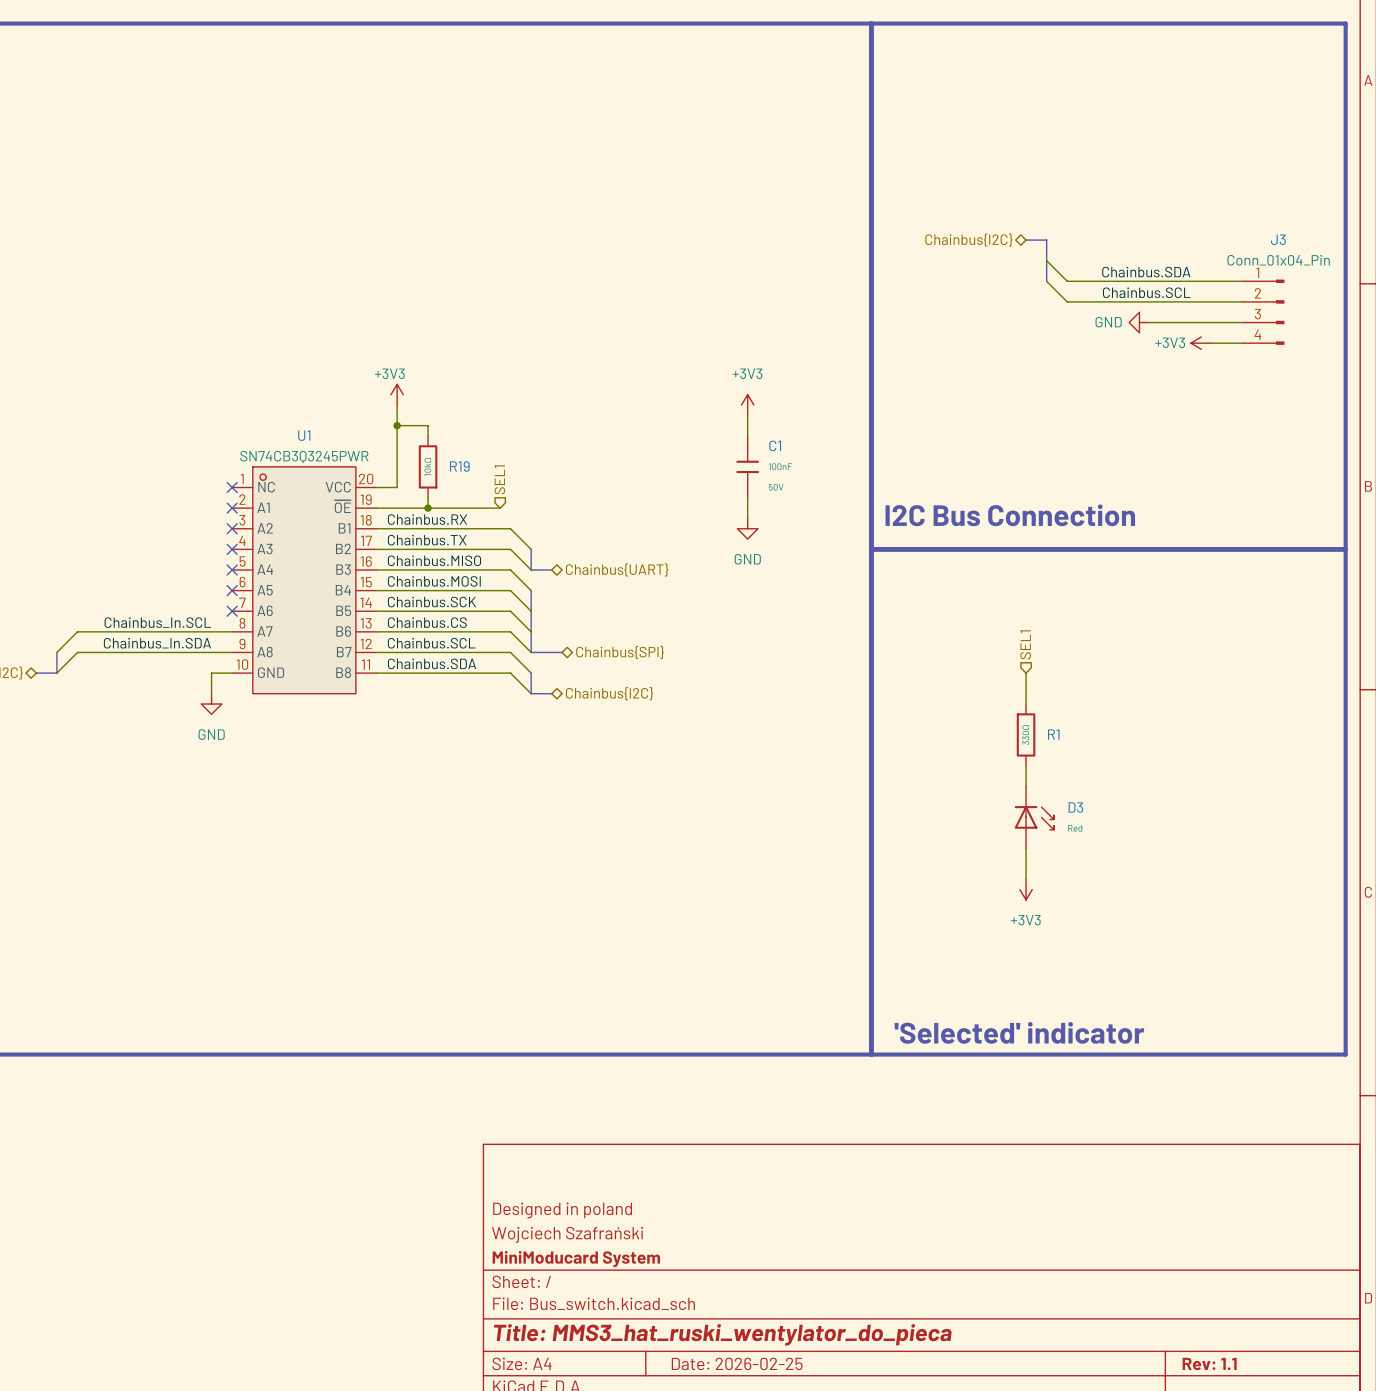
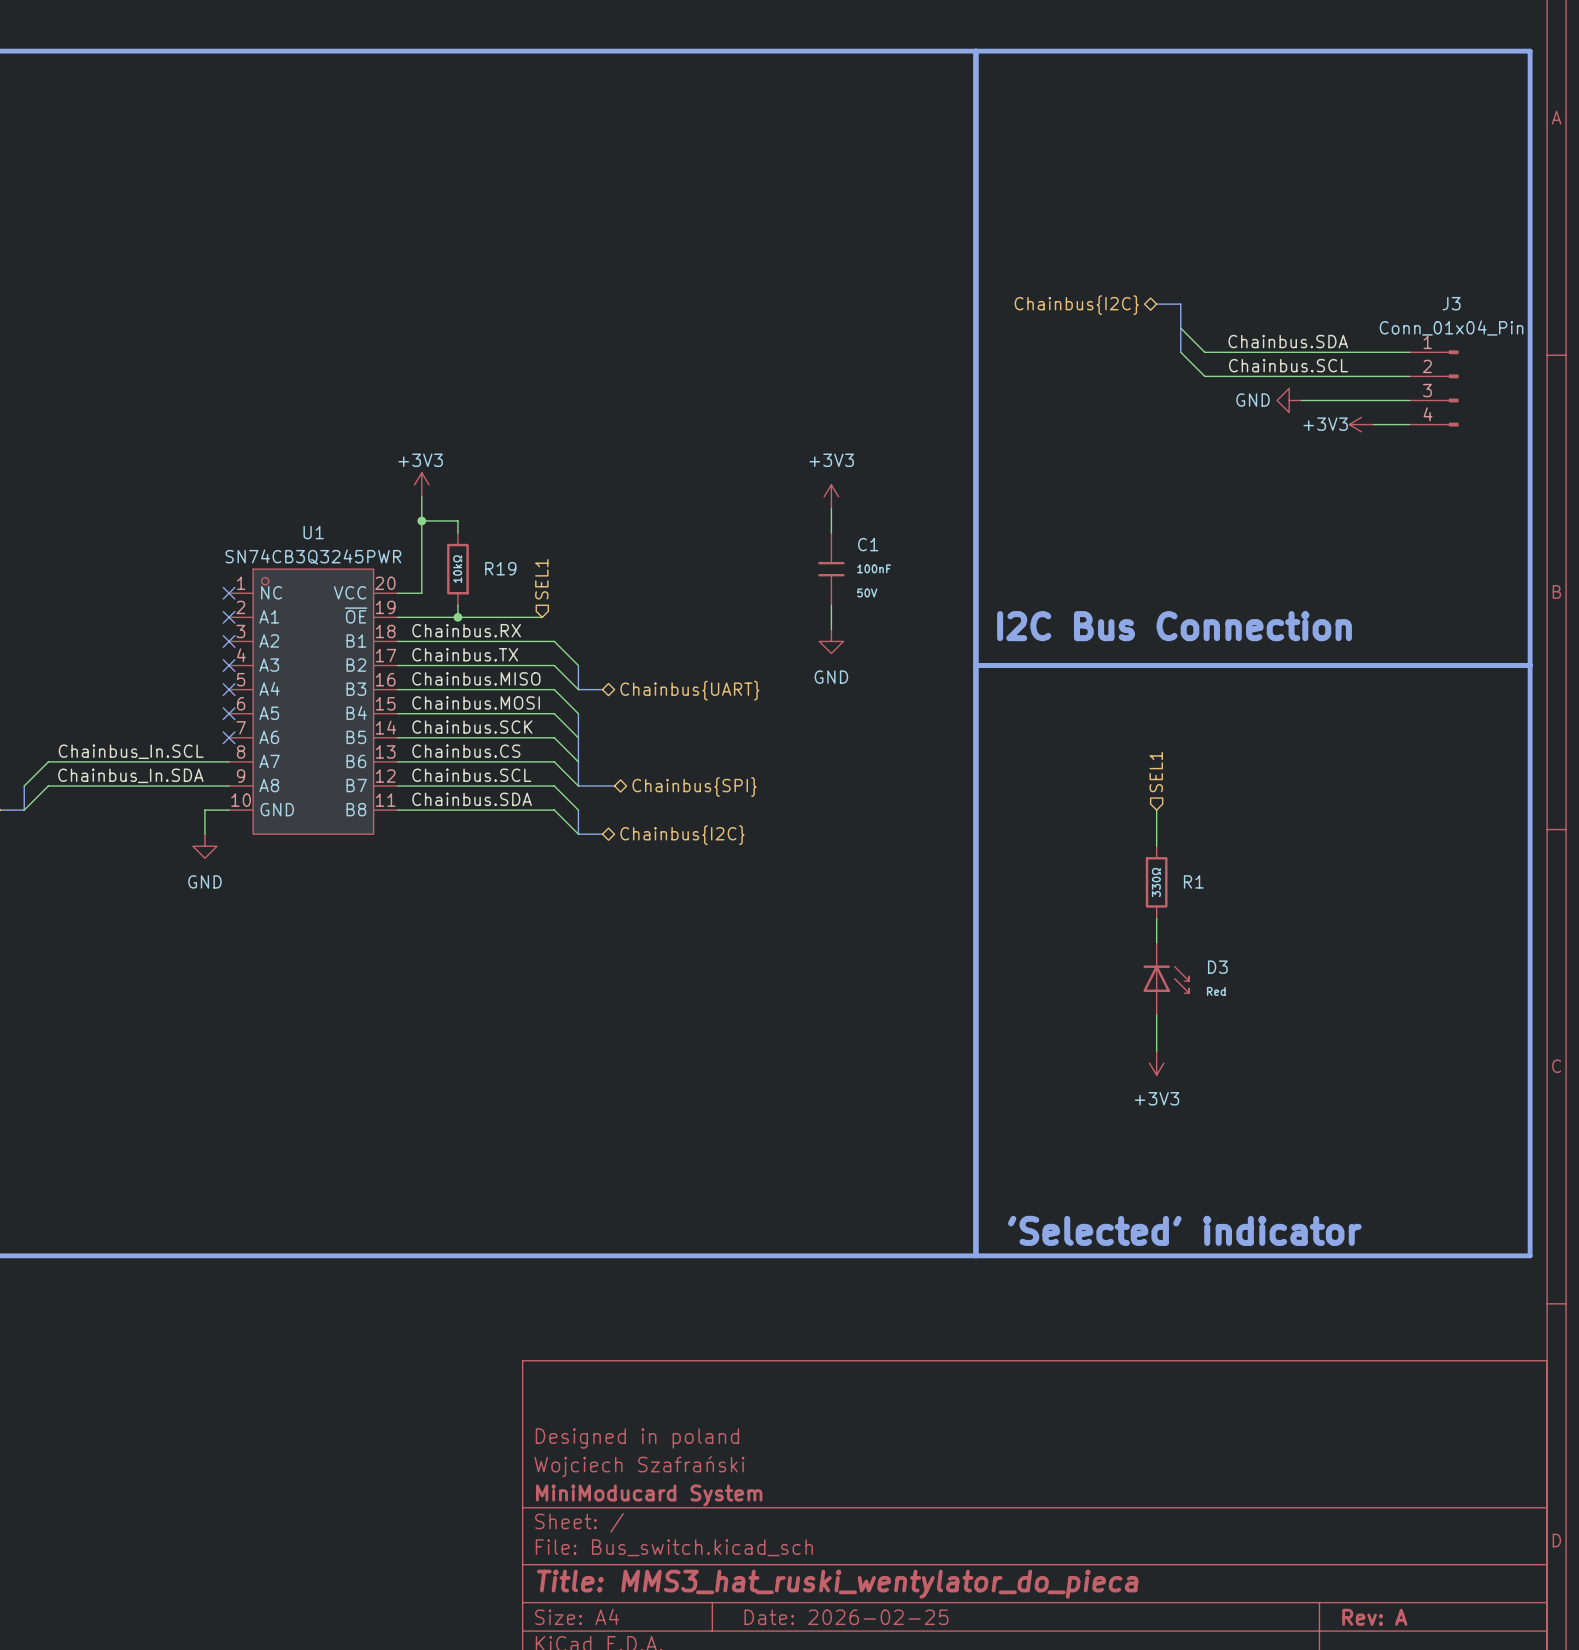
title block: Rev: 1.1 (1209, 1363) -> Rev: A (1374, 1617)

